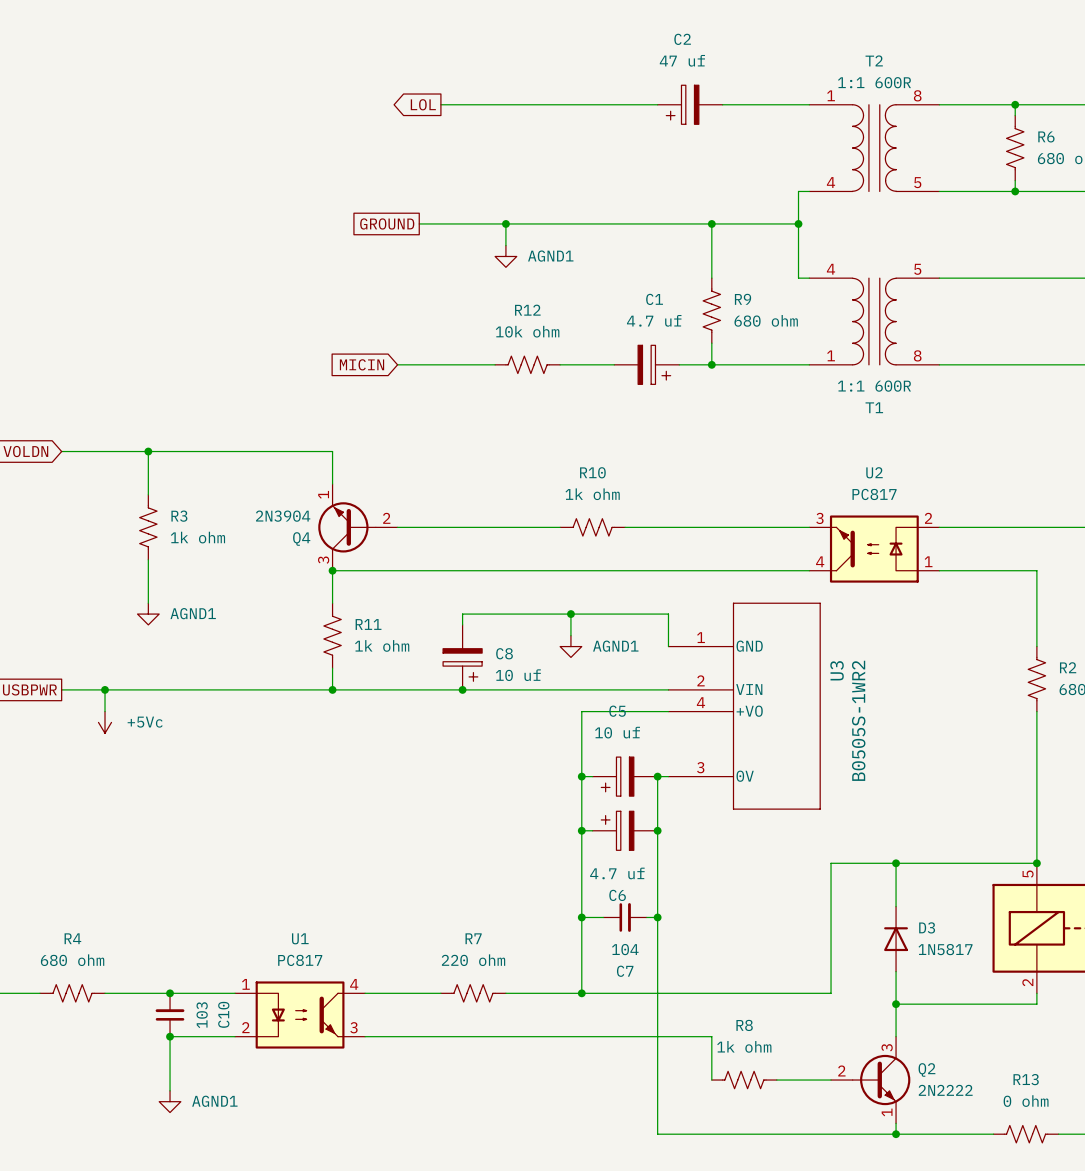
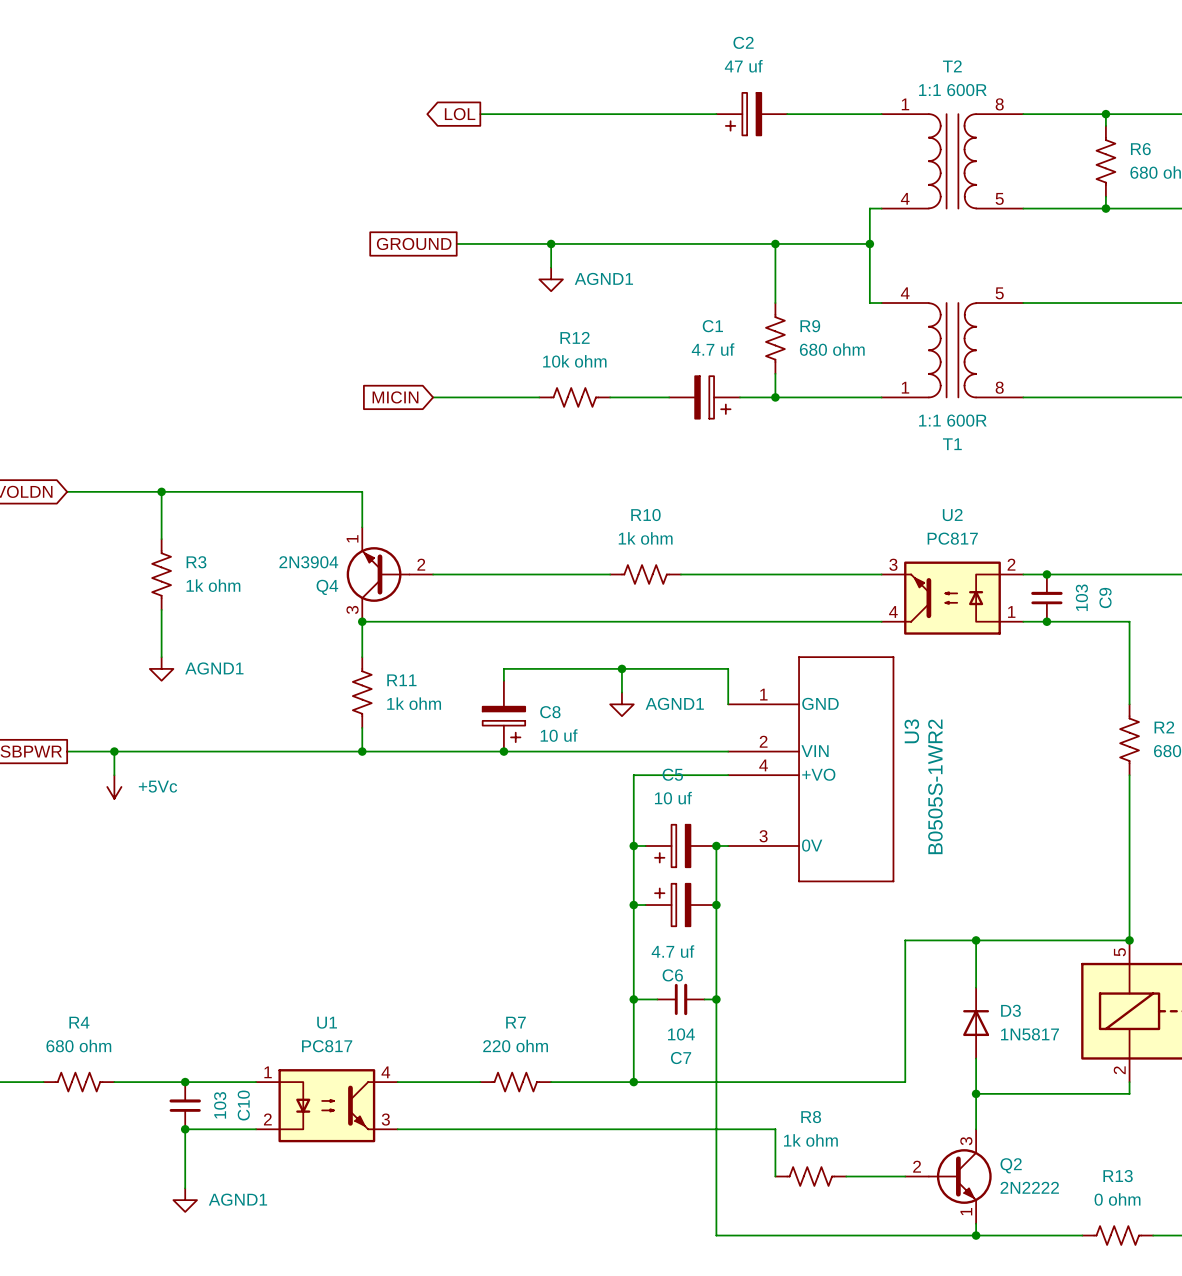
junction: none -> (1046, 574)
C9: none -> 103 (1046, 598)
junction: none -> (1046, 621)

